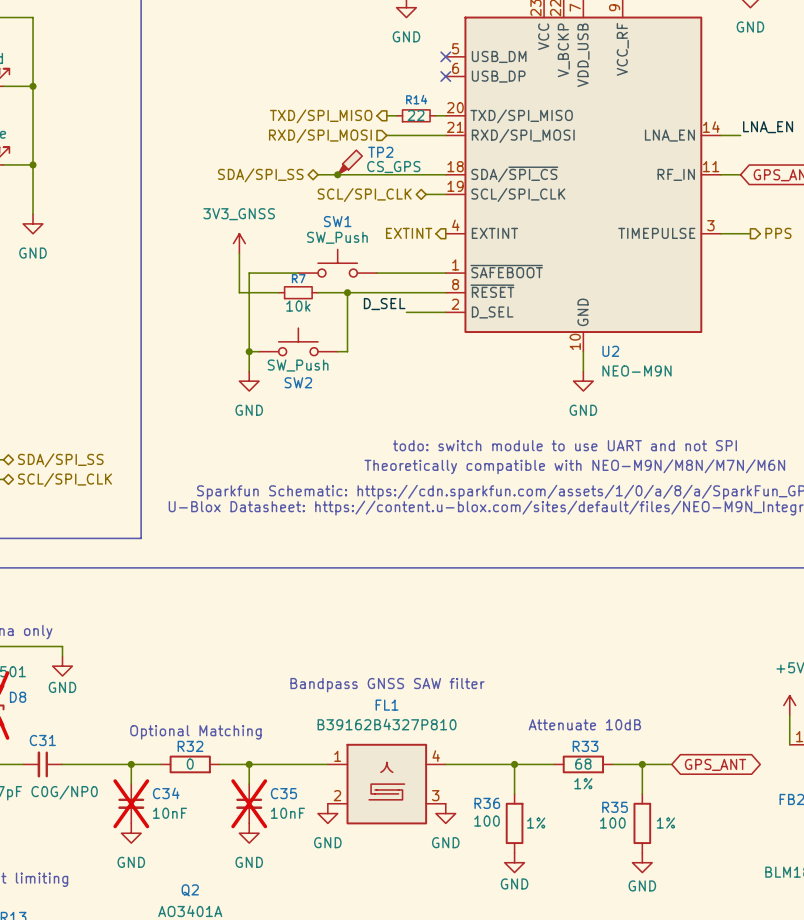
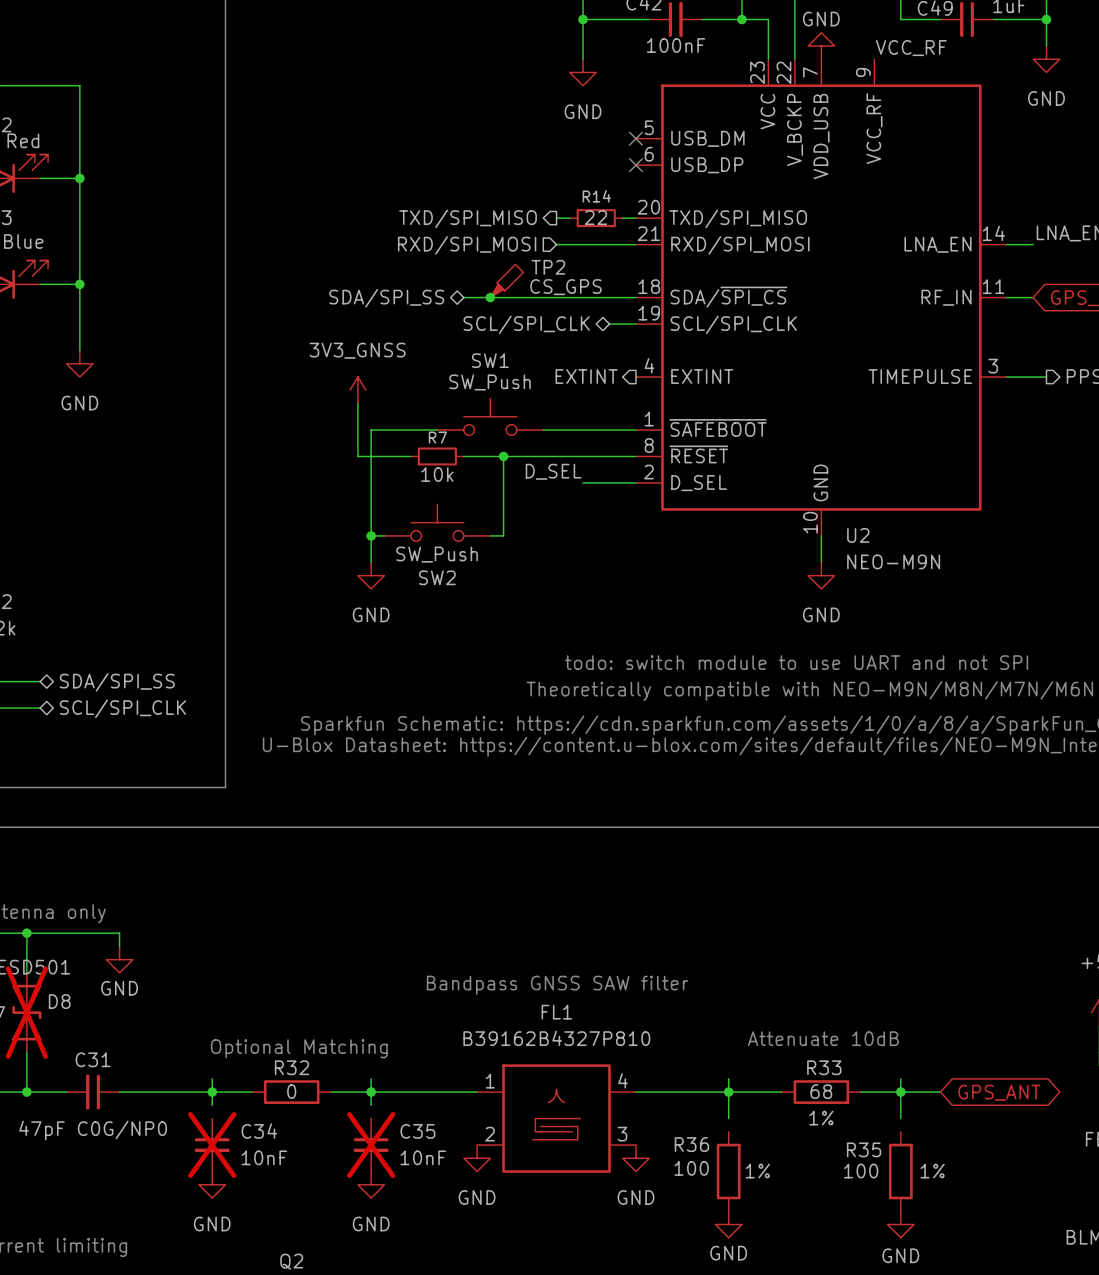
wire: (131, 774) (131, 784) -> (212, 1078) (212, 1092)
wire: (249, 774) (249, 784) -> (371, 1078) (371, 1092)
wire: (514, 784) (514, 793) -> (728, 1078) (728, 1092)
wire: (642, 784) (642, 793) -> (900, 1078) (900, 1092)

